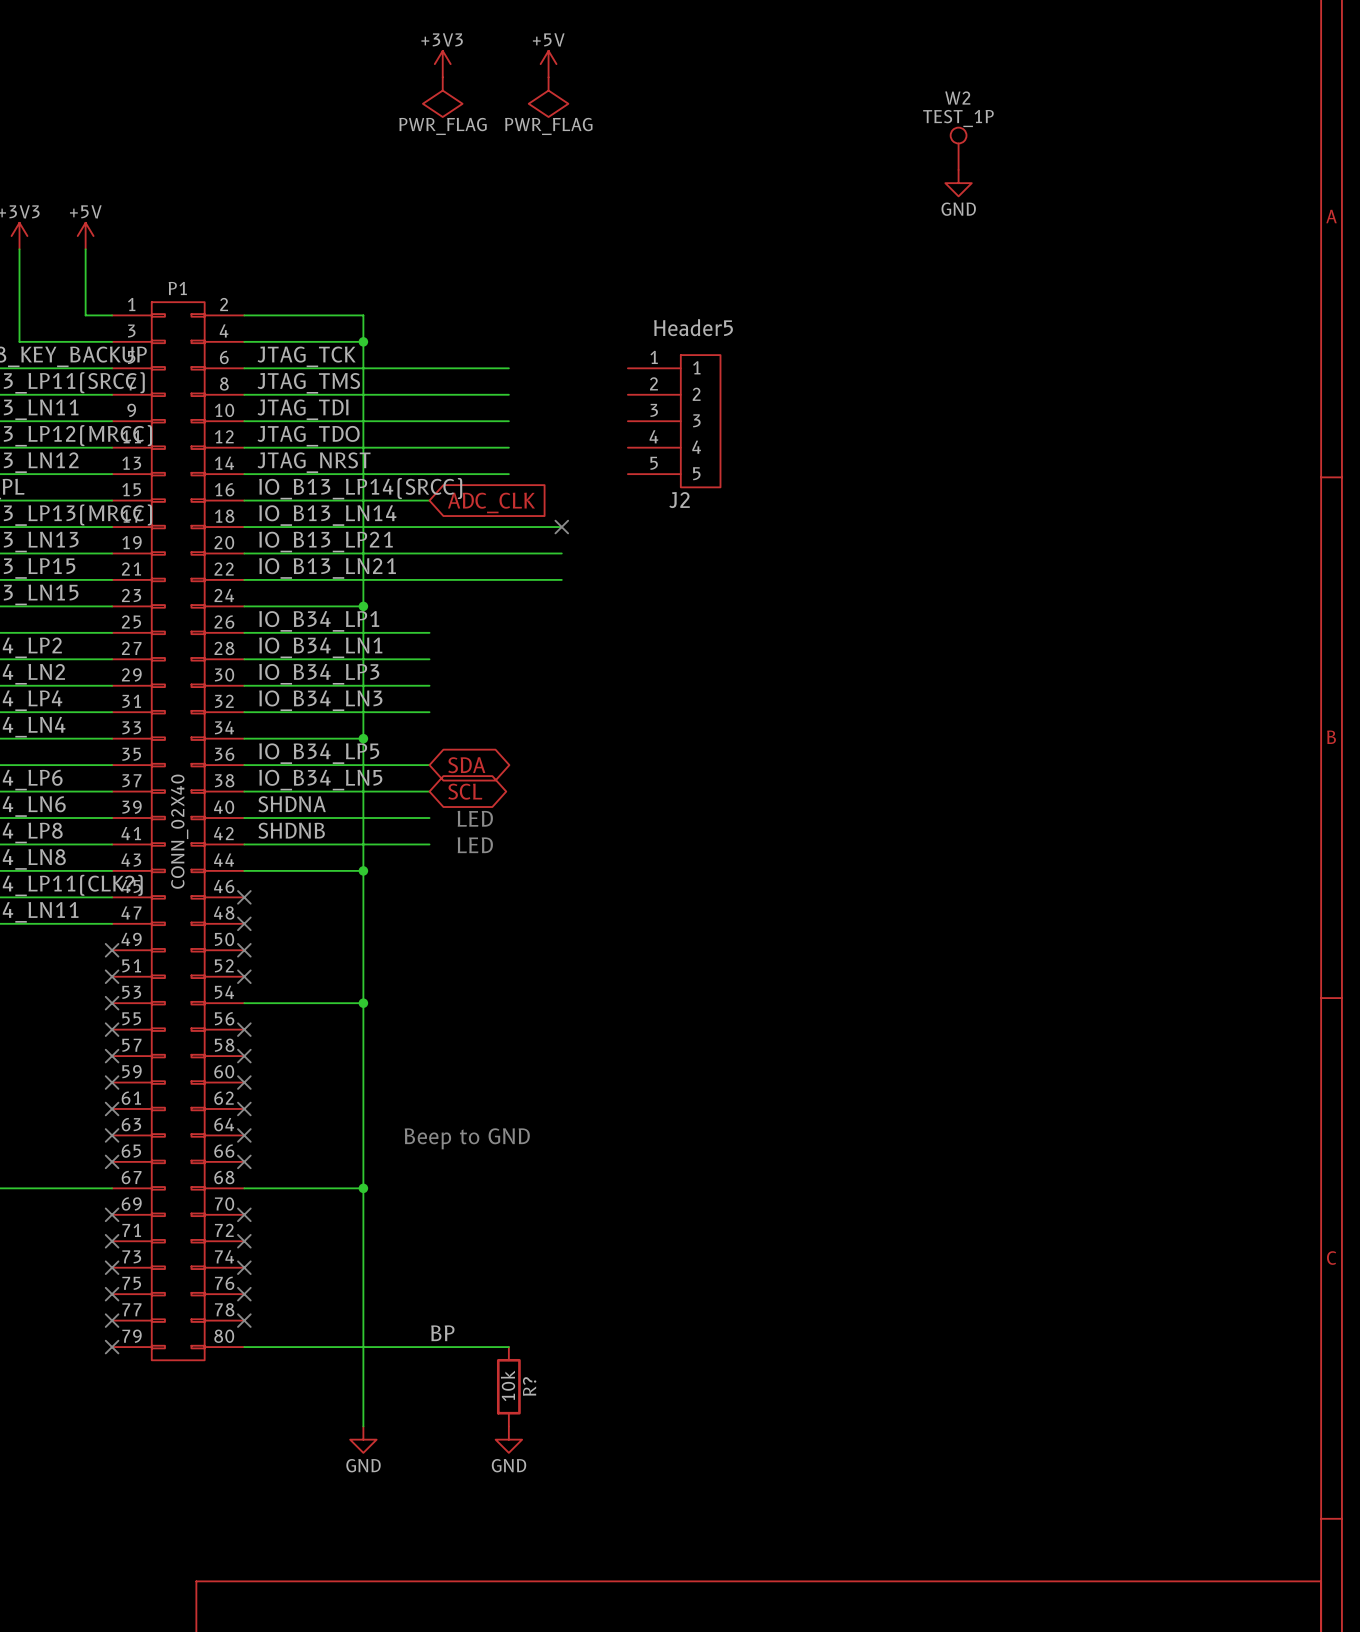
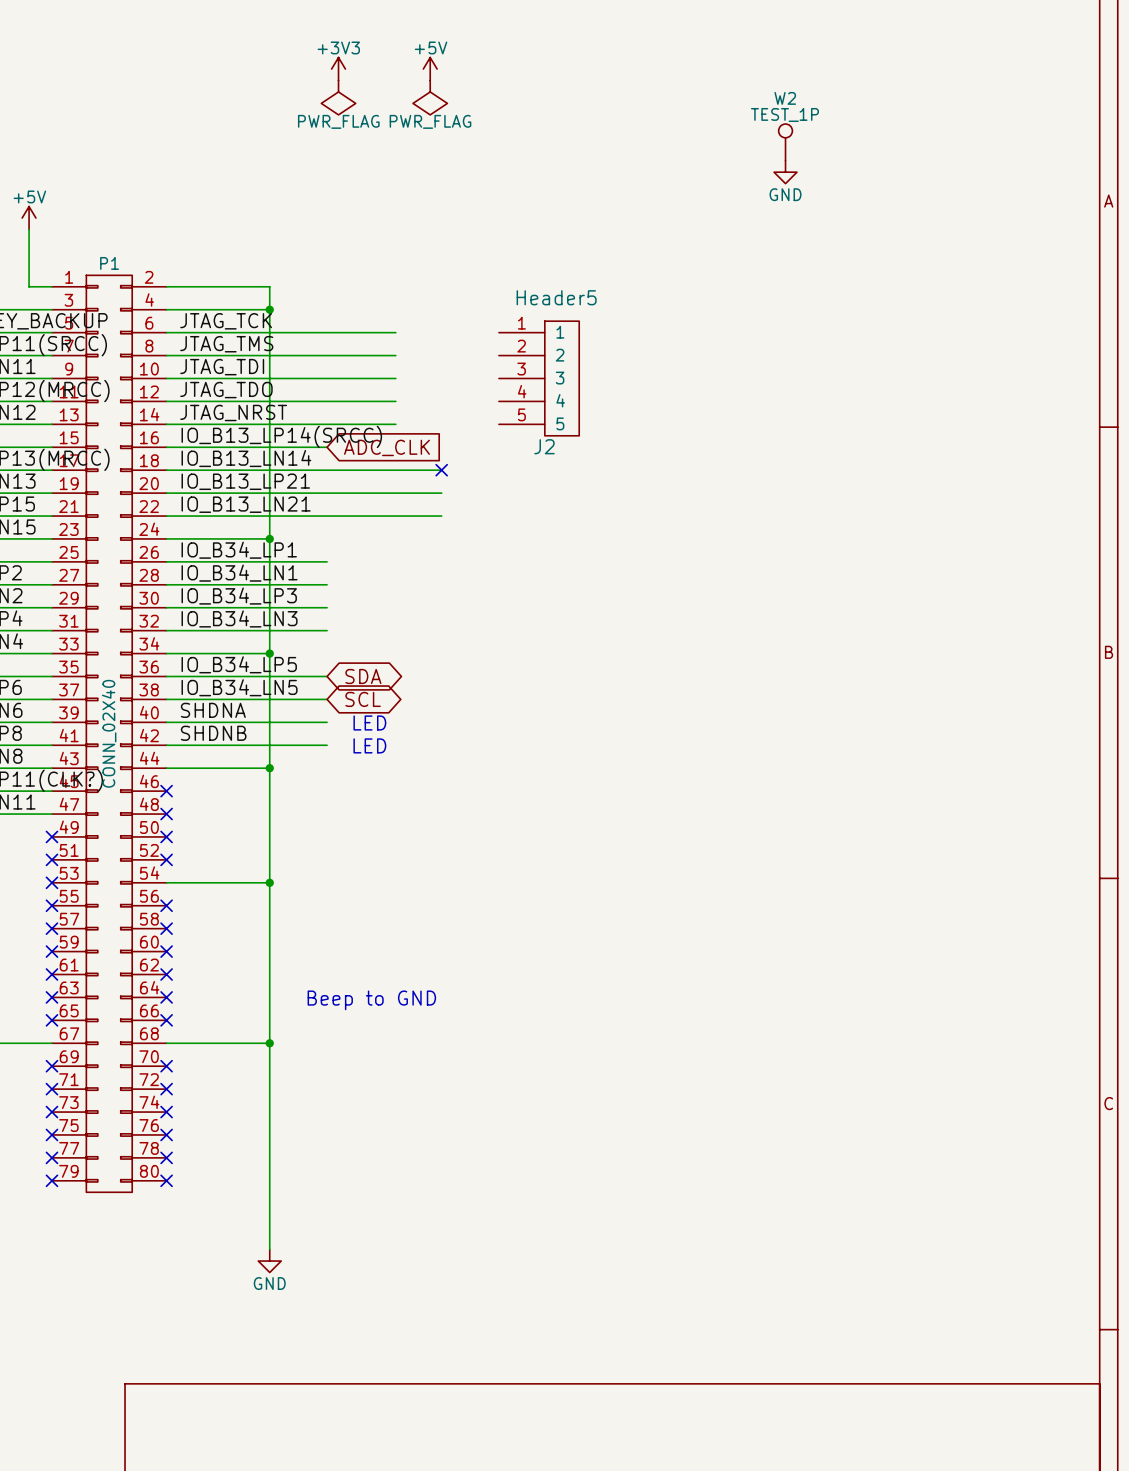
label: BP (442, 1333) -> none
wire: (244, 1347) (508, 1347) -> none
no-connect mark: none -> (166, 1180)
R?: 10k (508, 1386) -> none
power symbol: GND (508, 1439) -> none

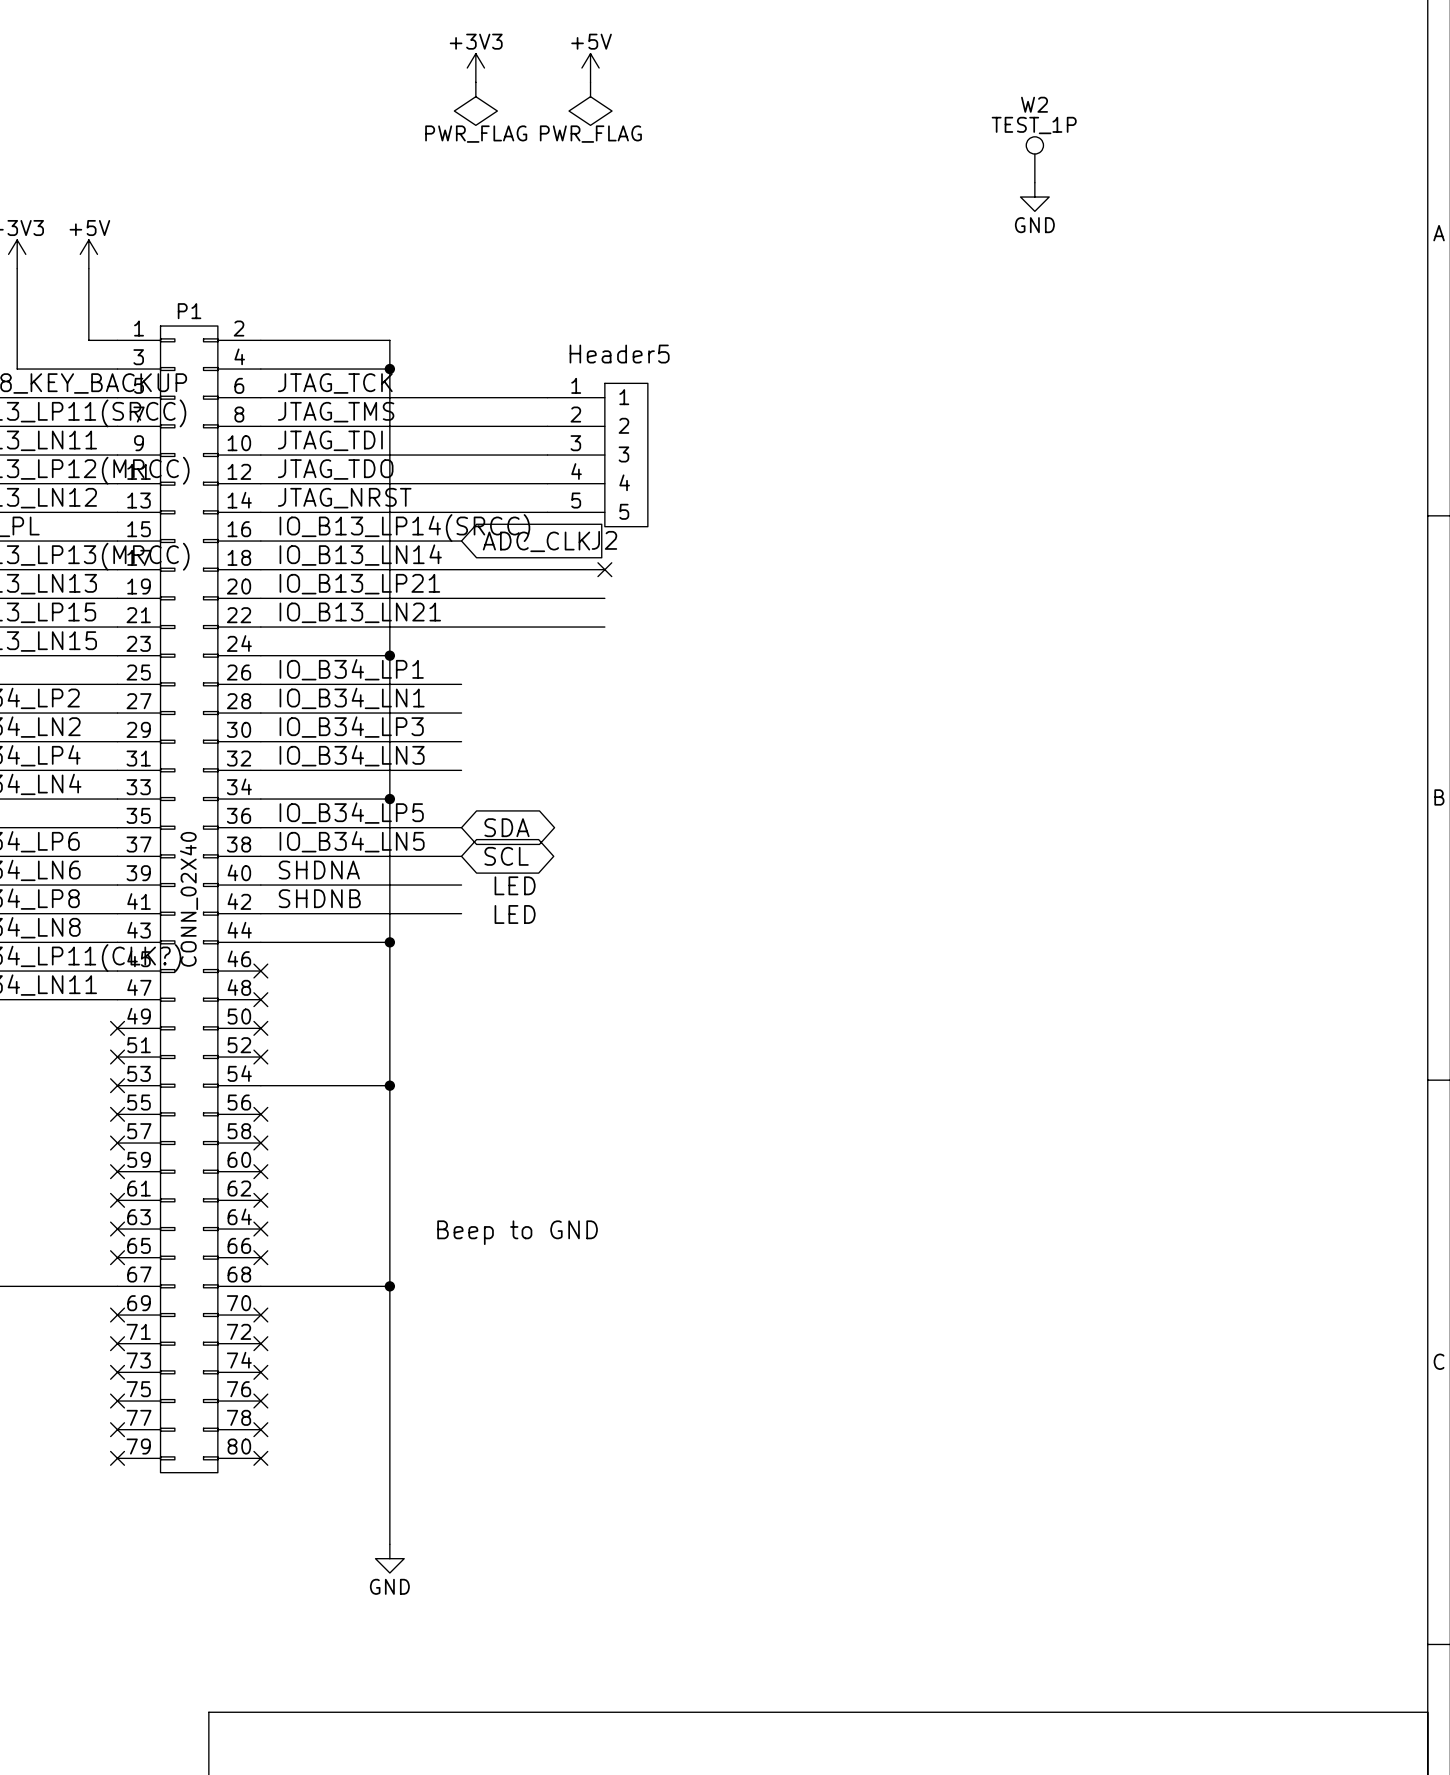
J2 position: (539, 378) -> (597, 455)

